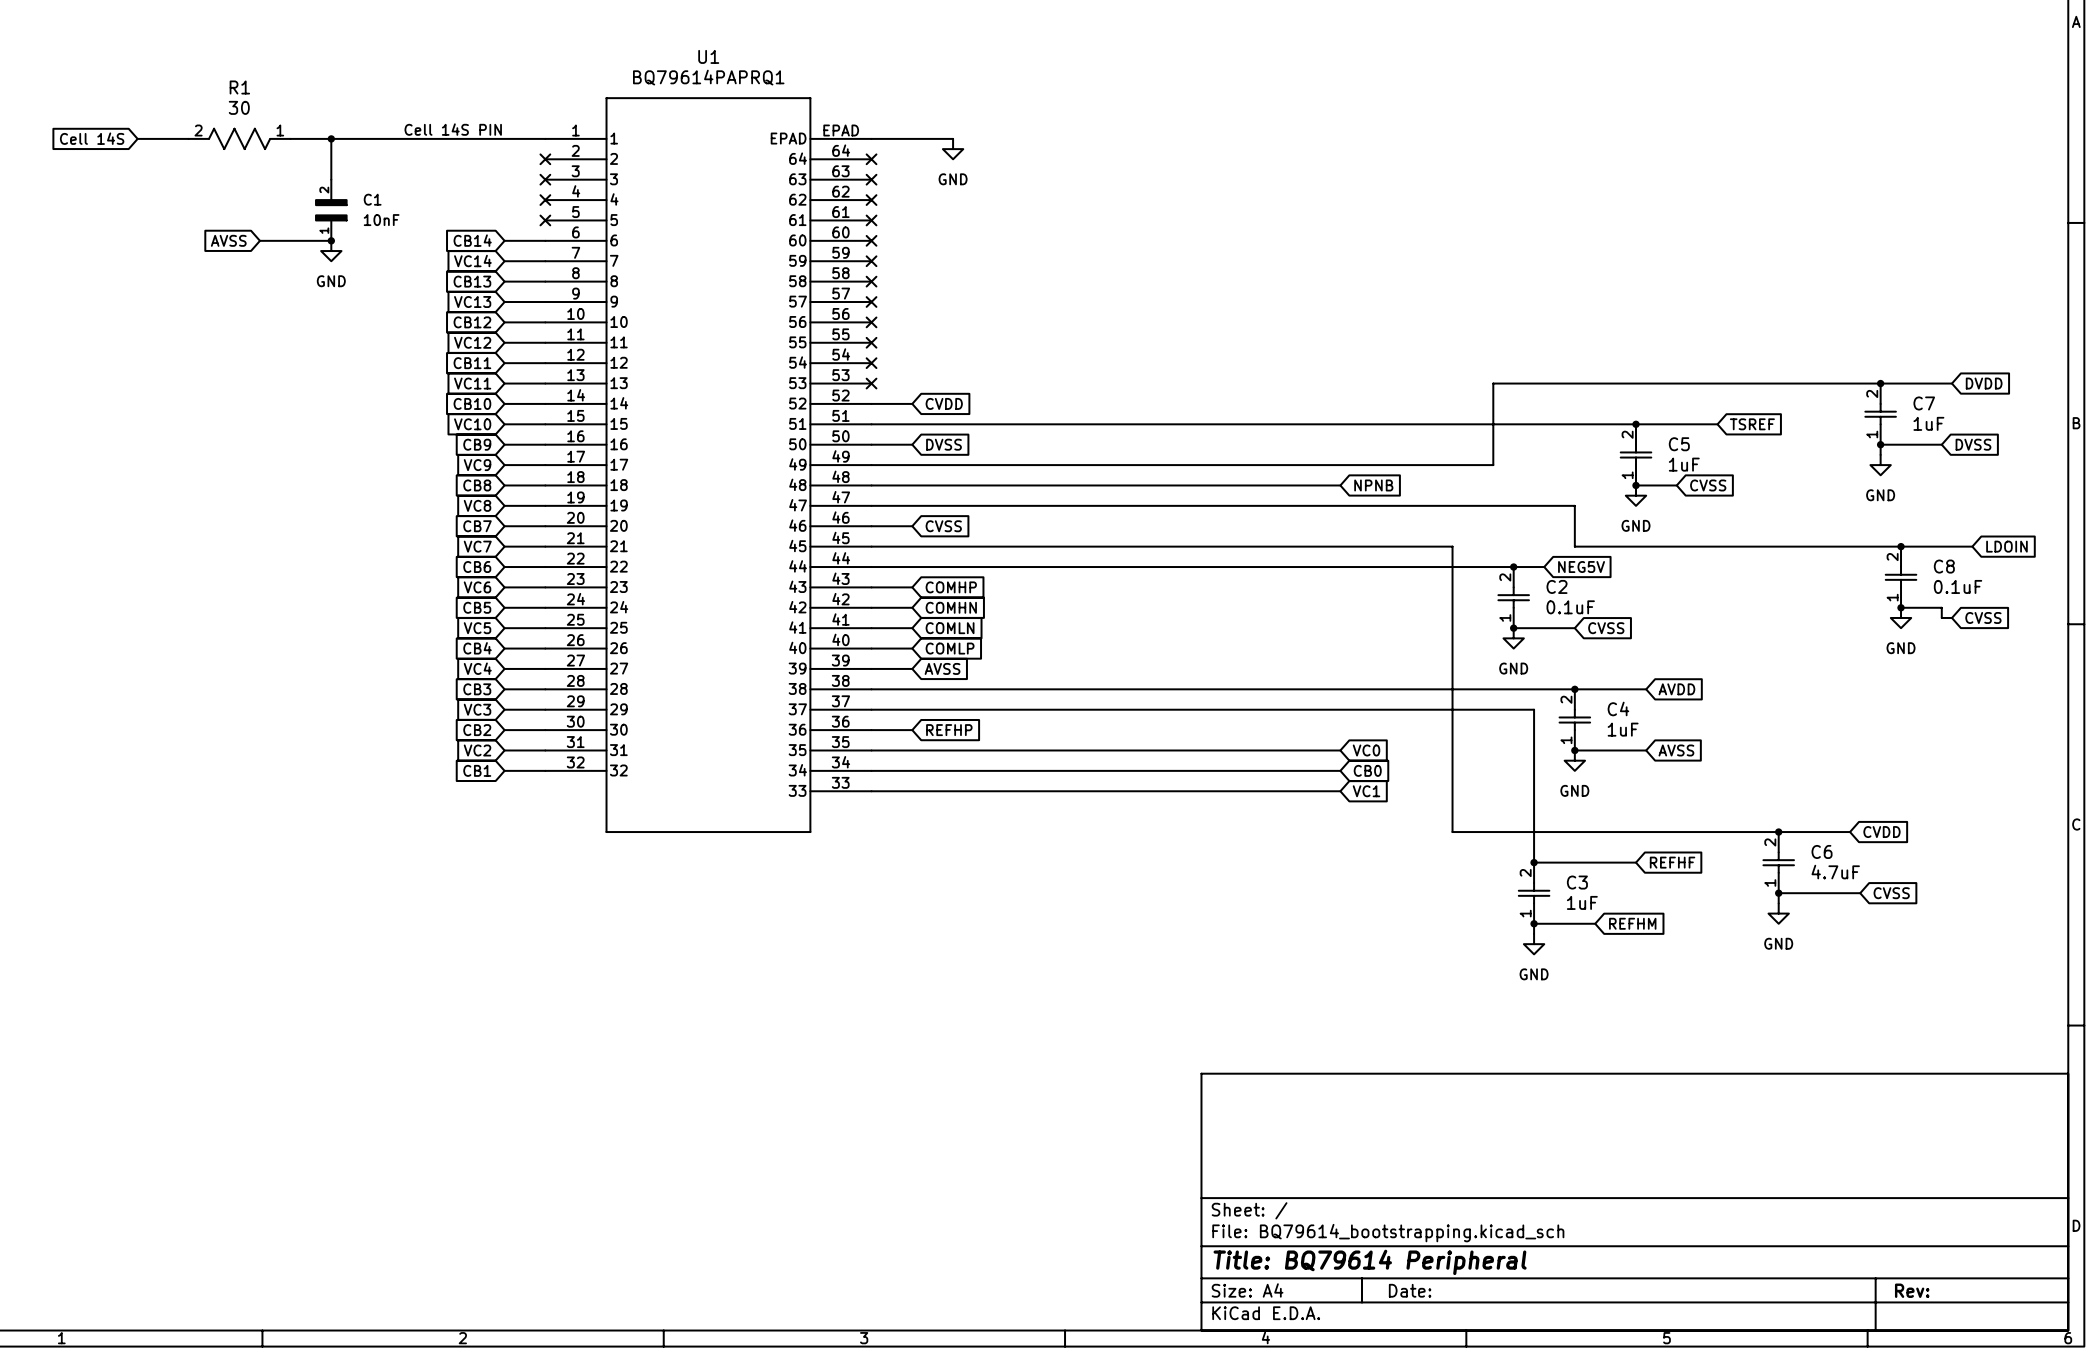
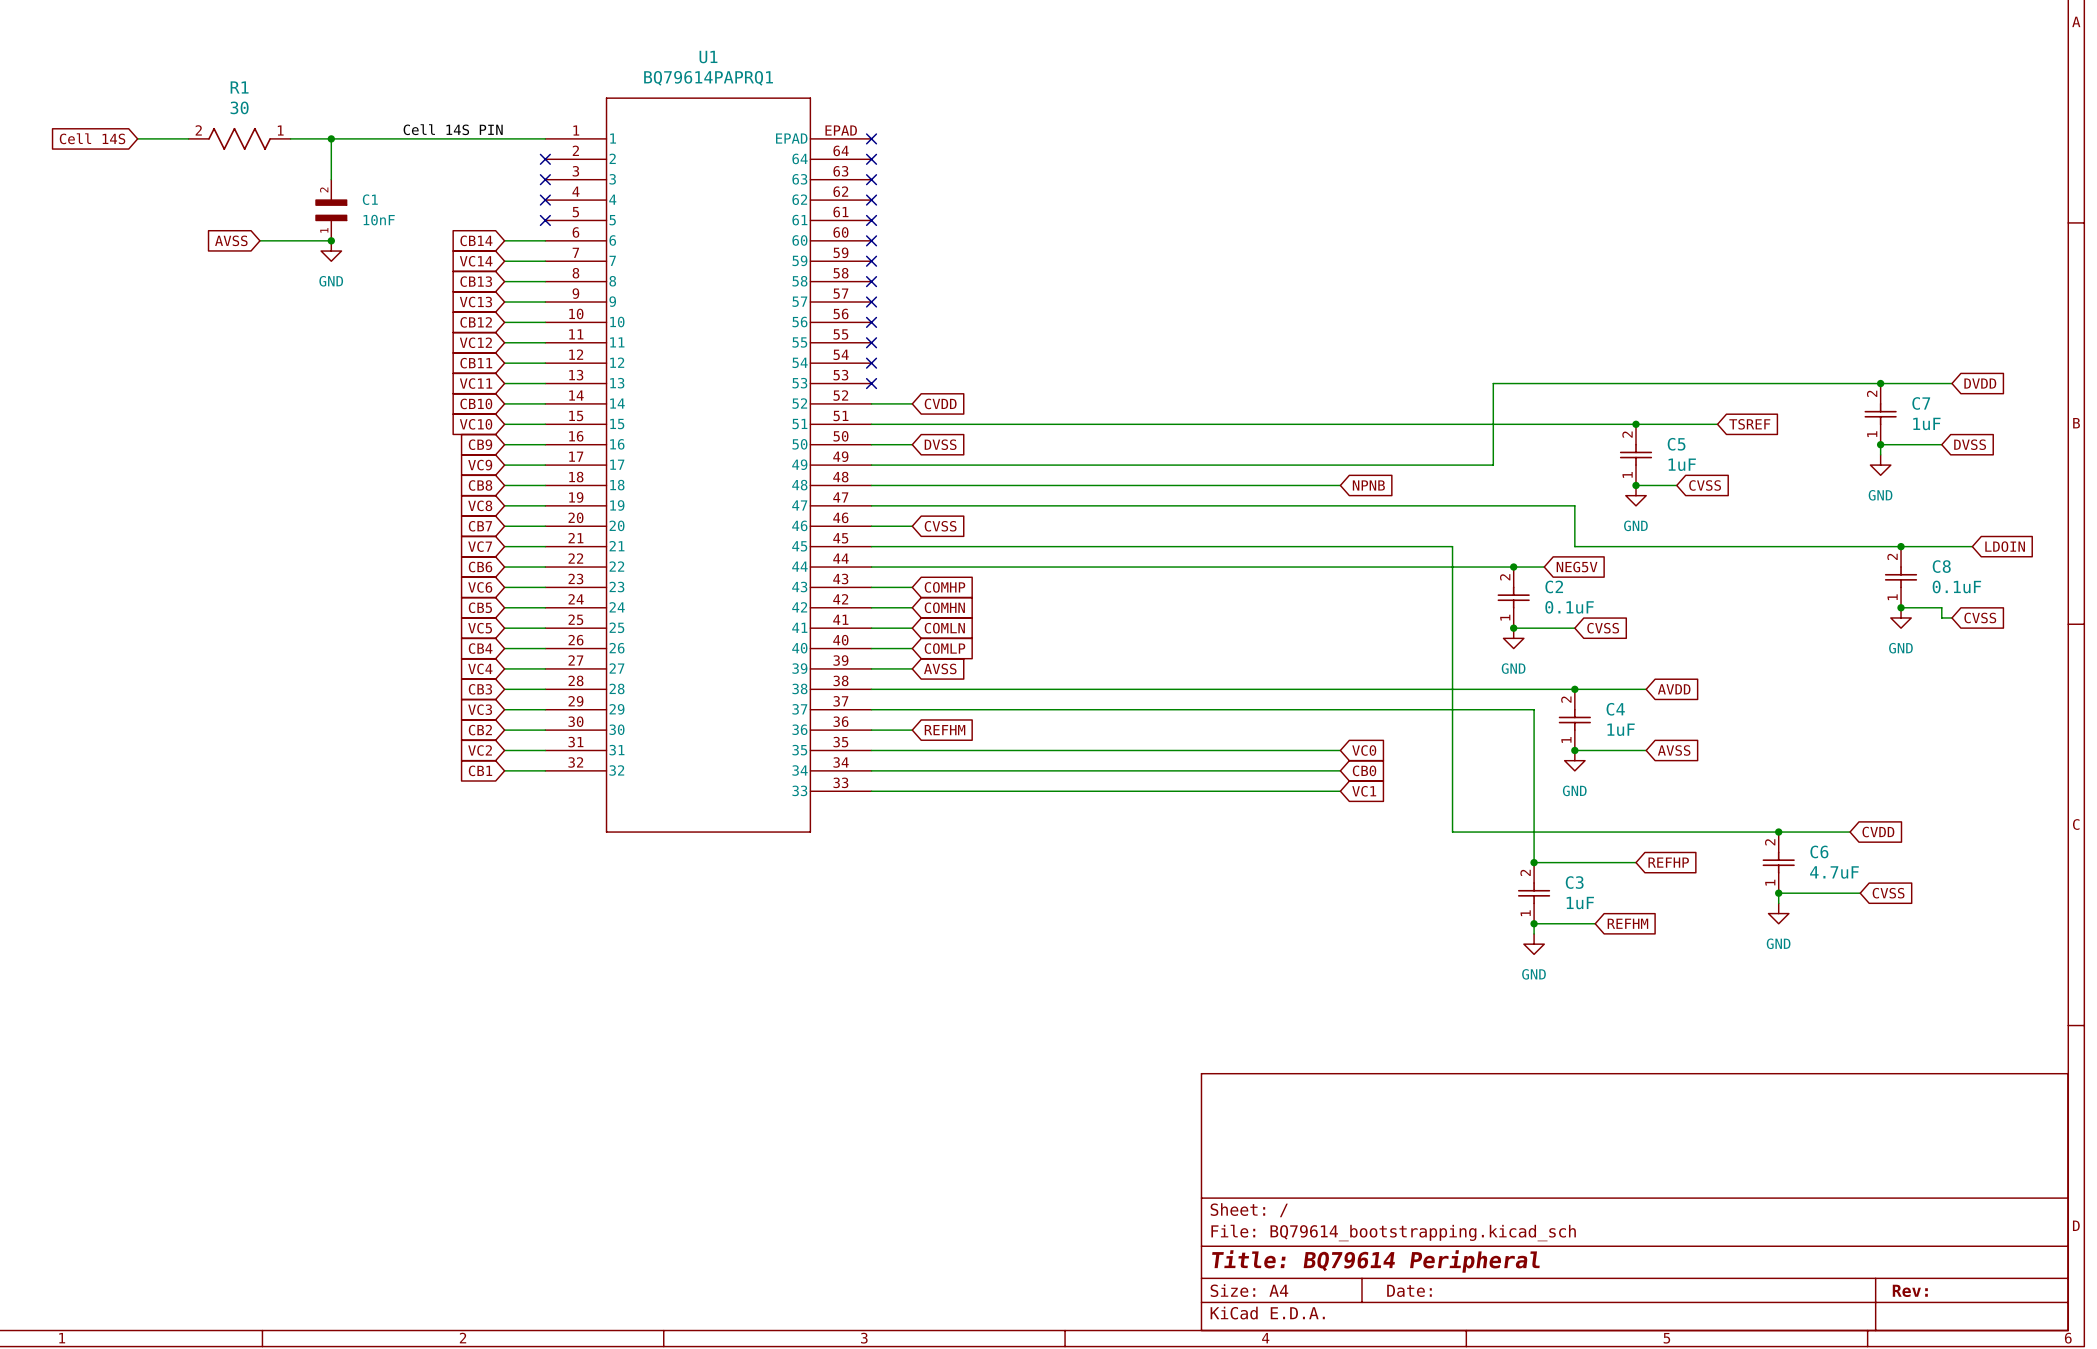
wire: (871, 138) (953, 138) -> none
no-connect mark: none -> (871, 138)
power symbol: GND (953, 149) -> none
global label: REFHP (949, 730) -> REFHM (945, 730)
global label: REFHF (1672, 862) -> REFHP (1668, 862)

